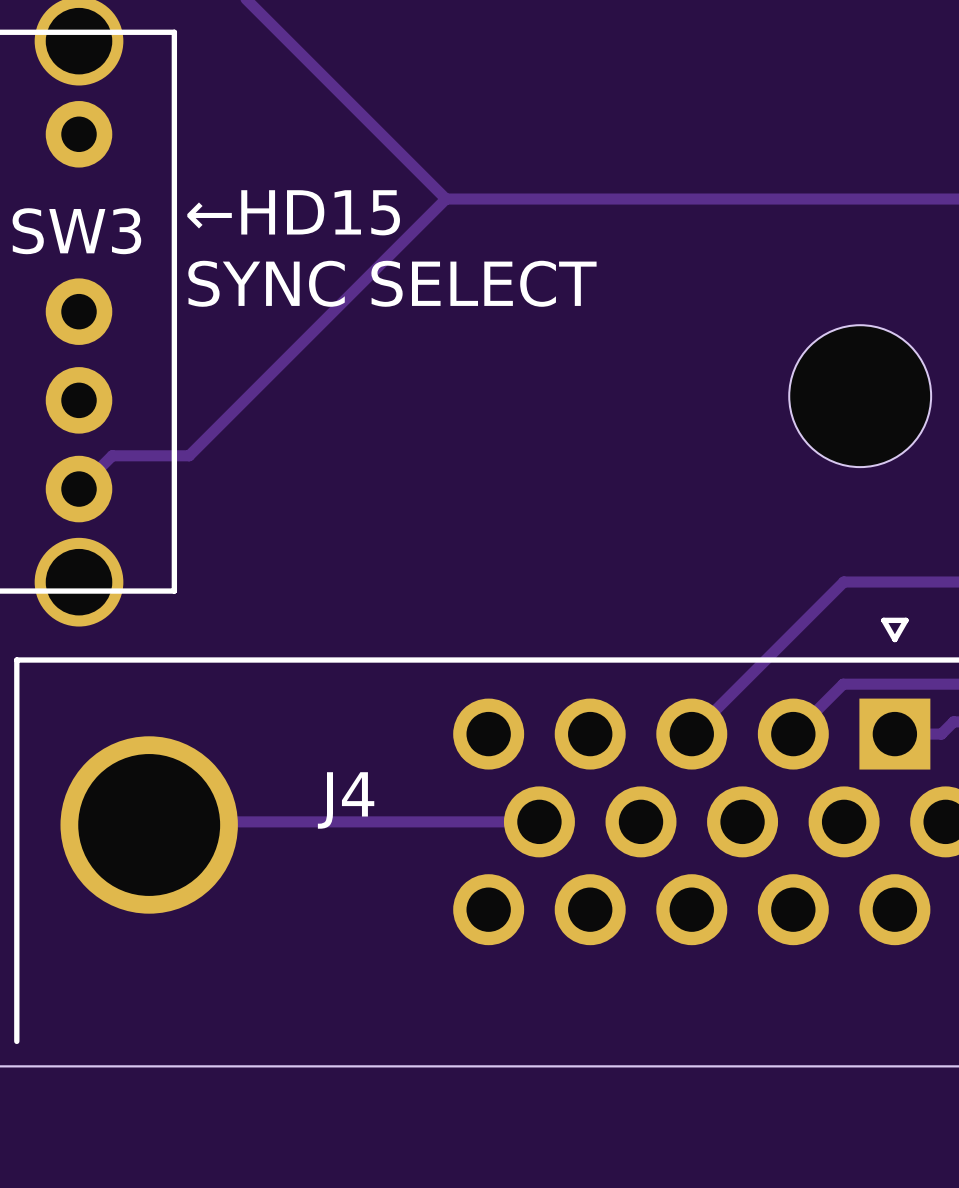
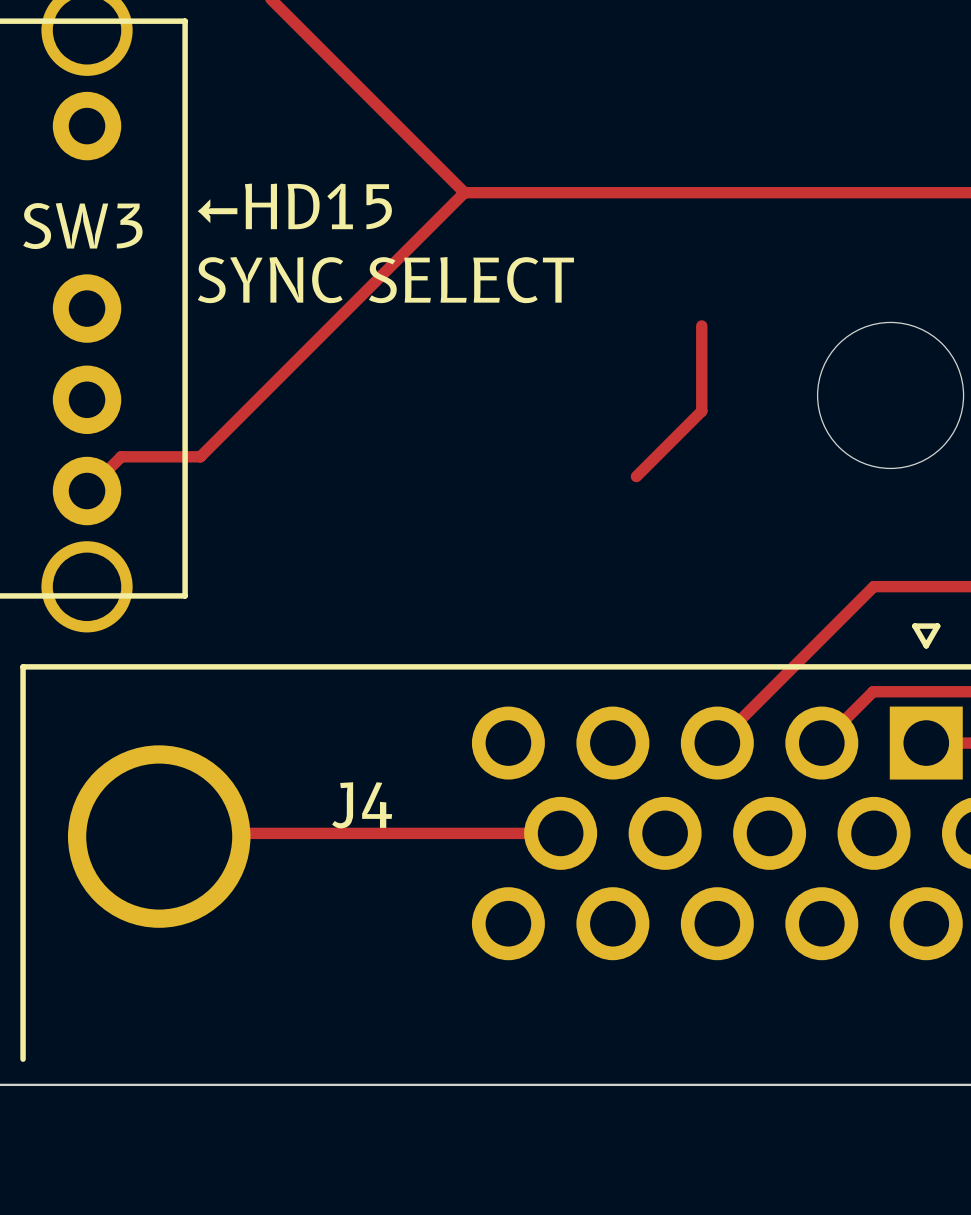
track: none -> (701, 325) (701, 411) (636, 476)

